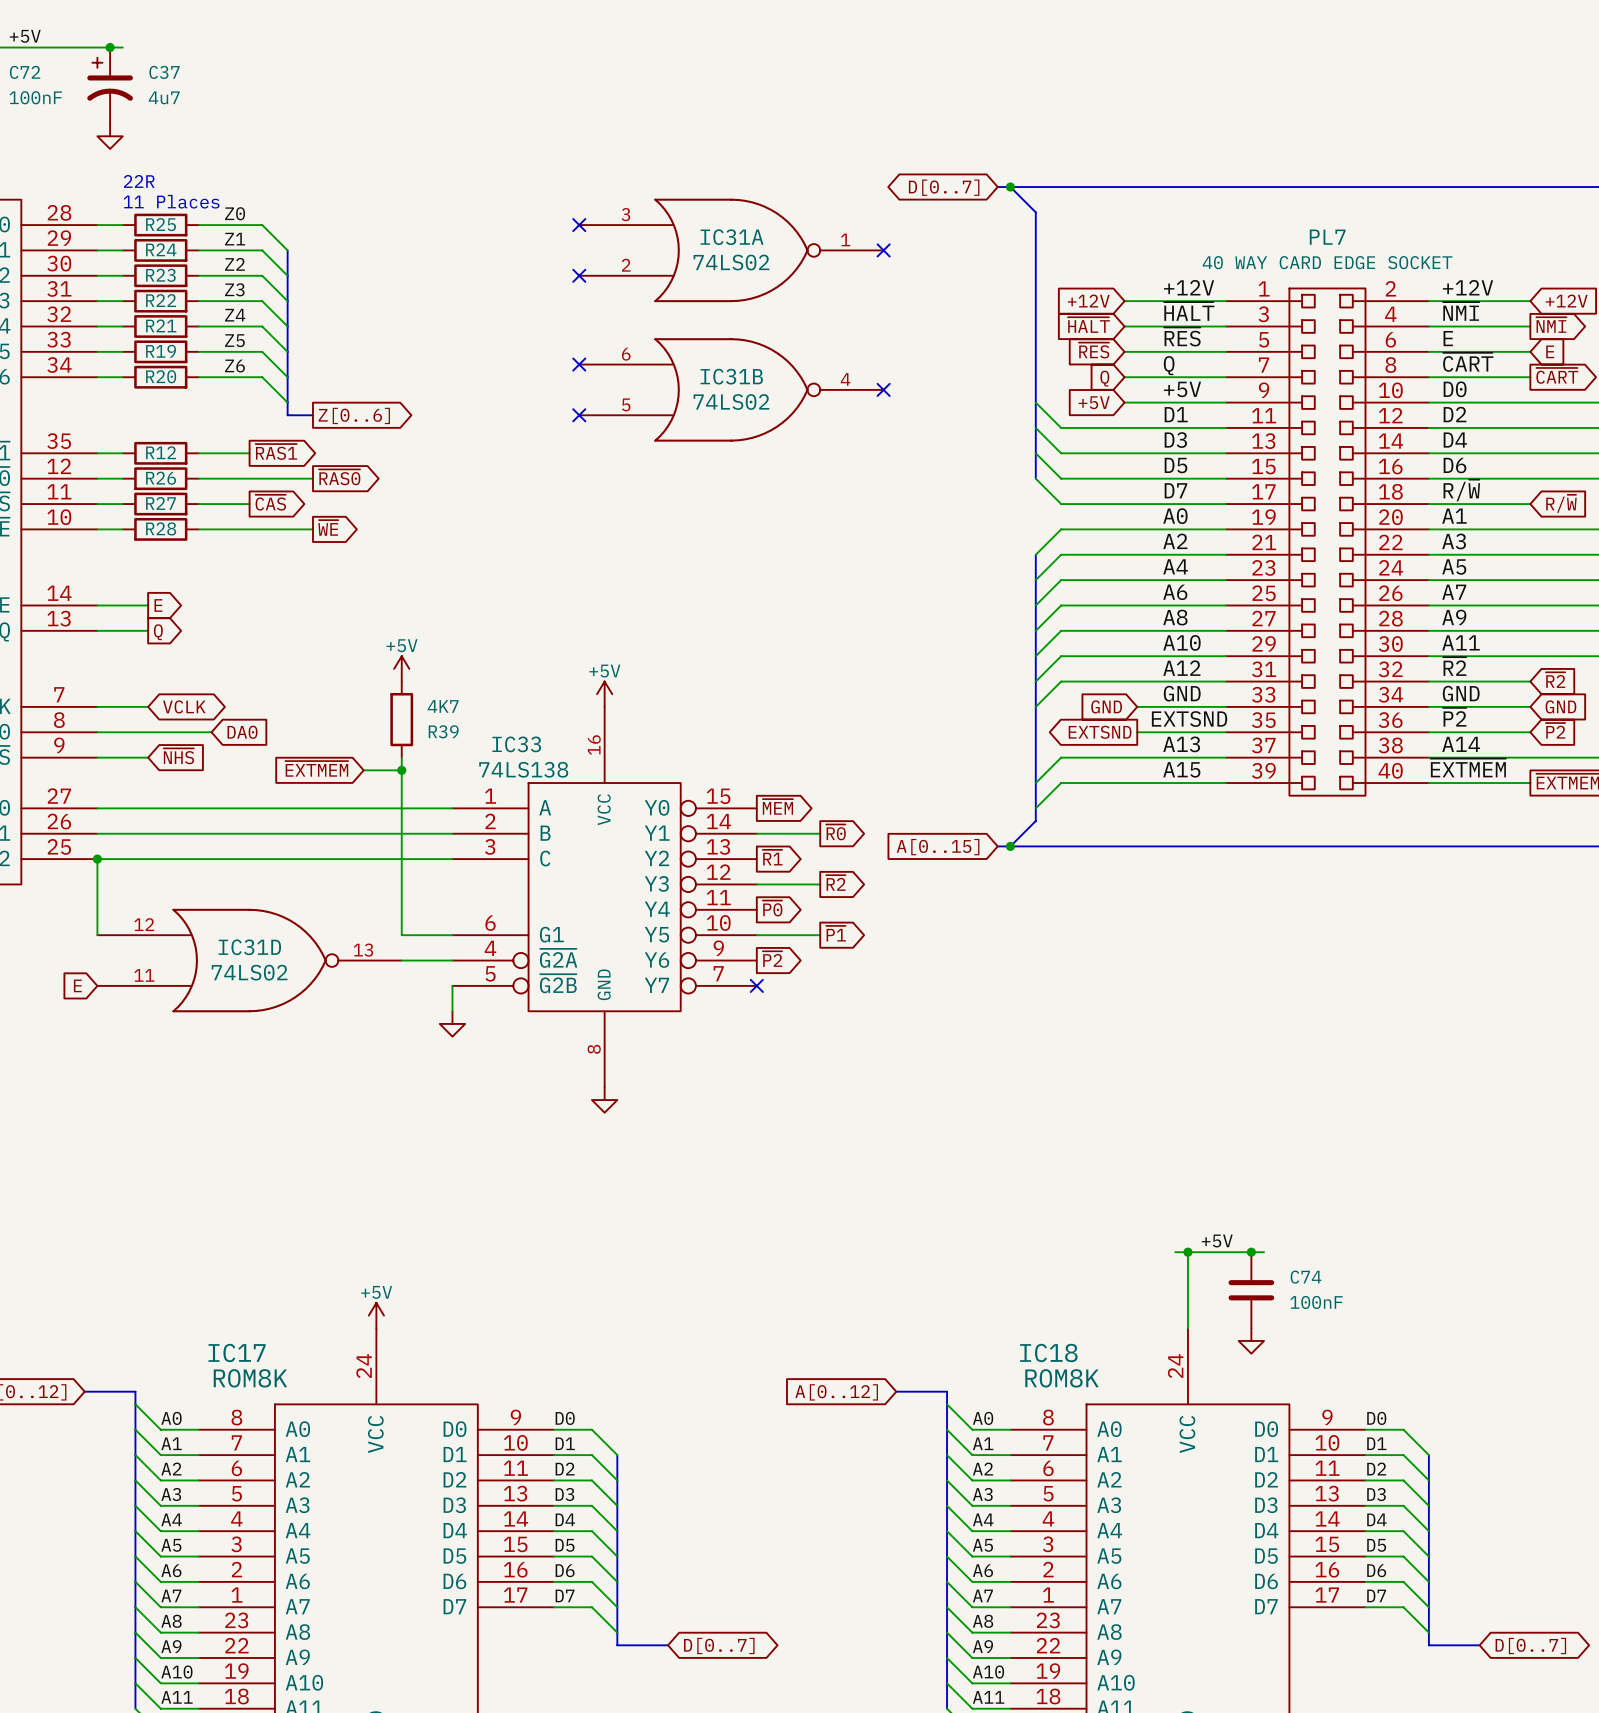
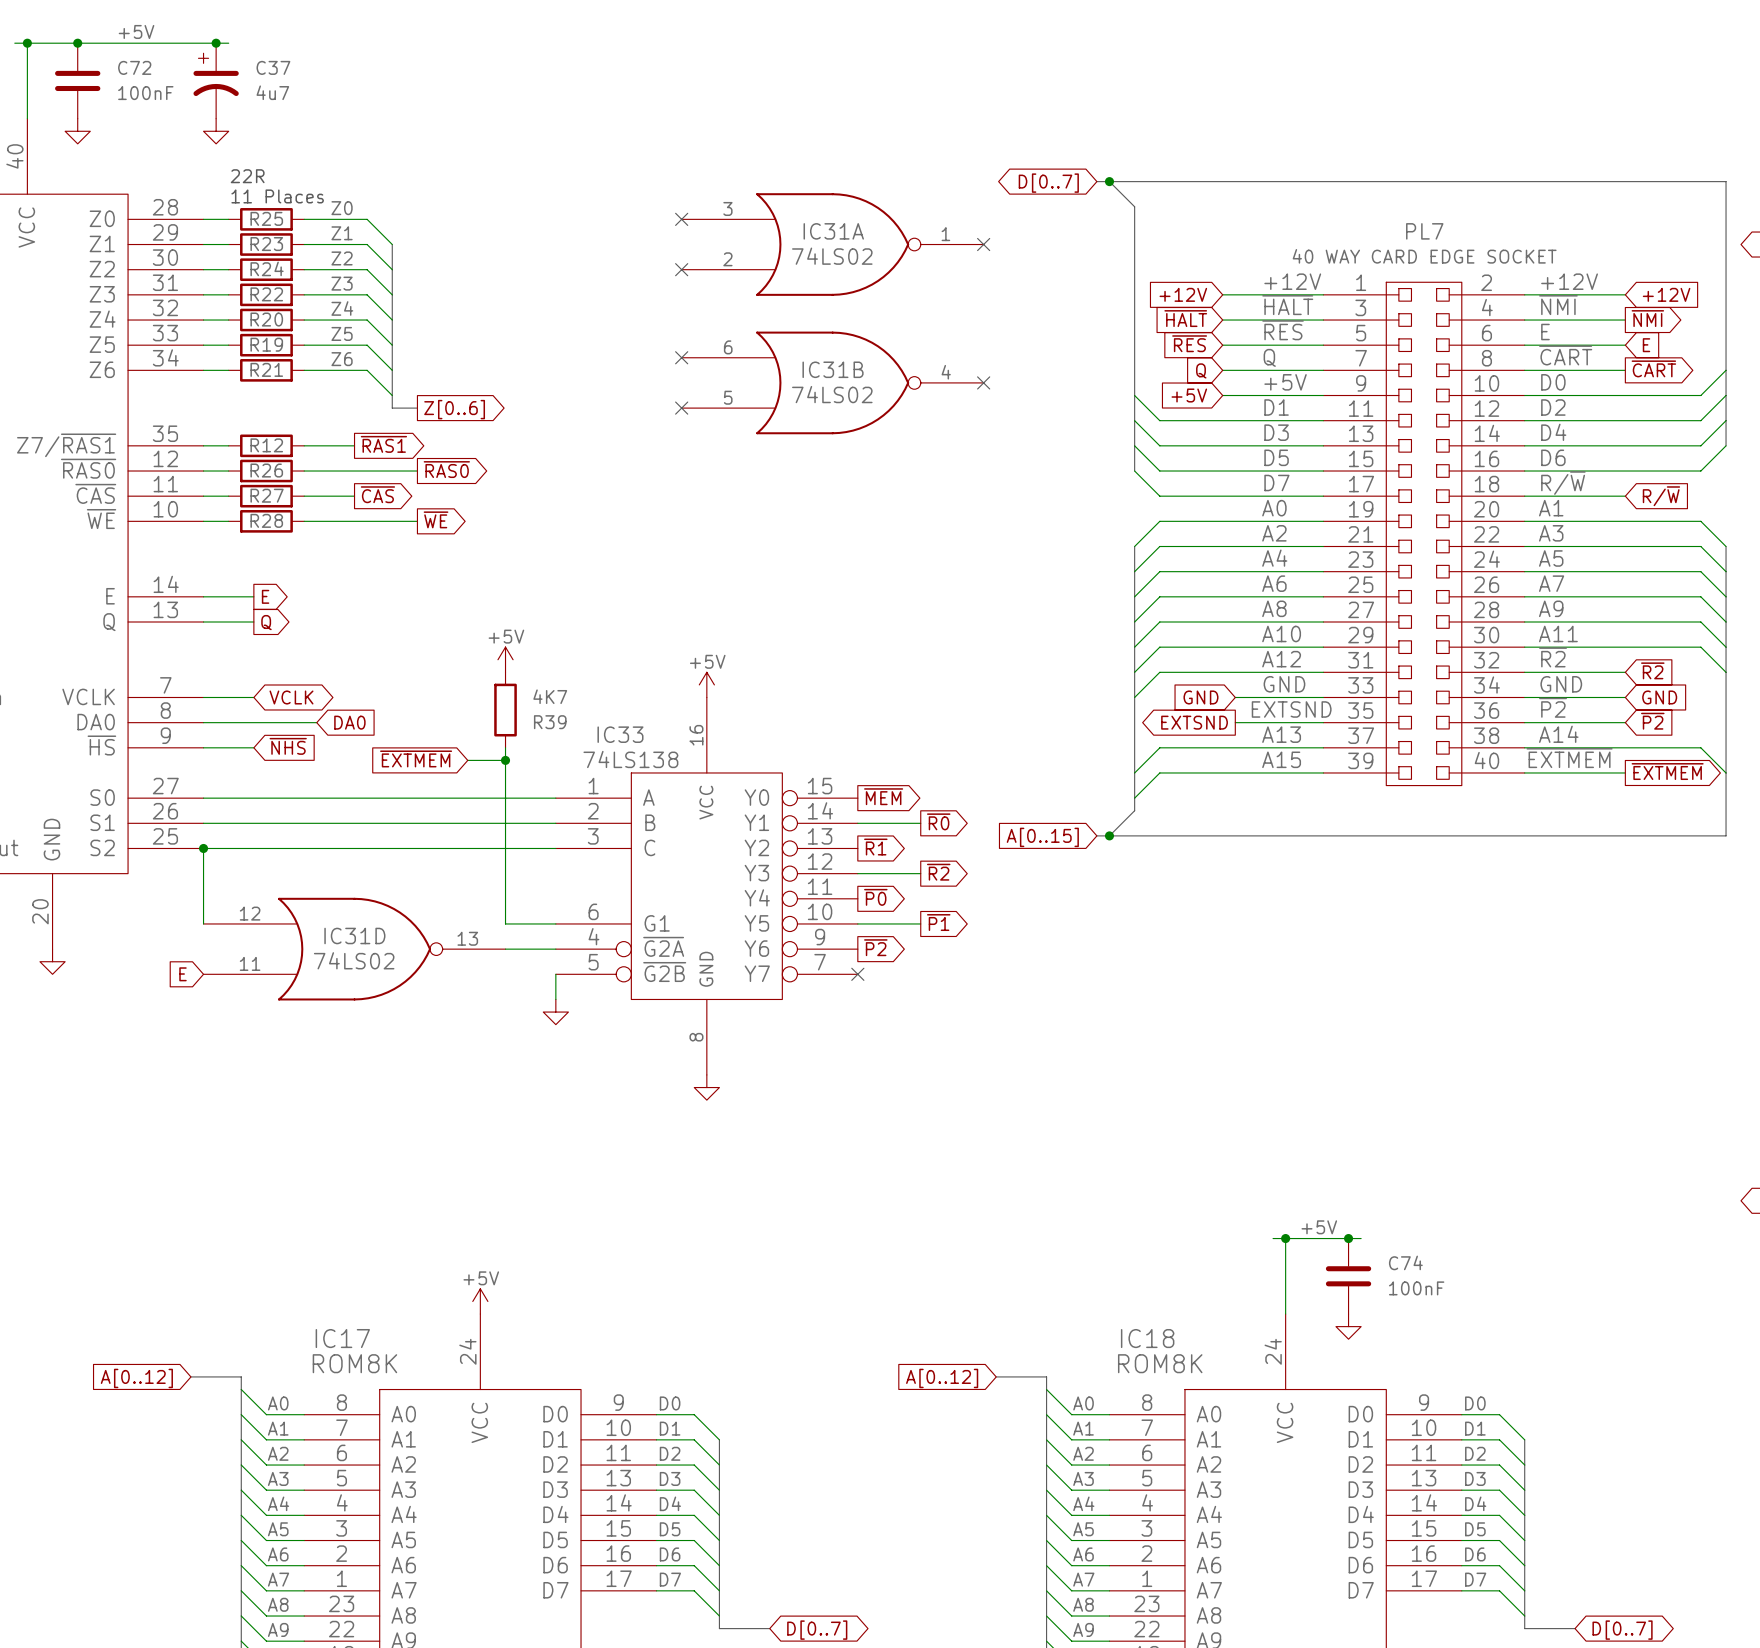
R24 name: R24 (161, 249) -> R23 (266, 244)
R23 name: R23 (160, 275) -> R24 (267, 268)
R21 name: R21 (161, 325) -> R20 (266, 319)
R20 name: R20 (161, 376) -> R21 (266, 369)

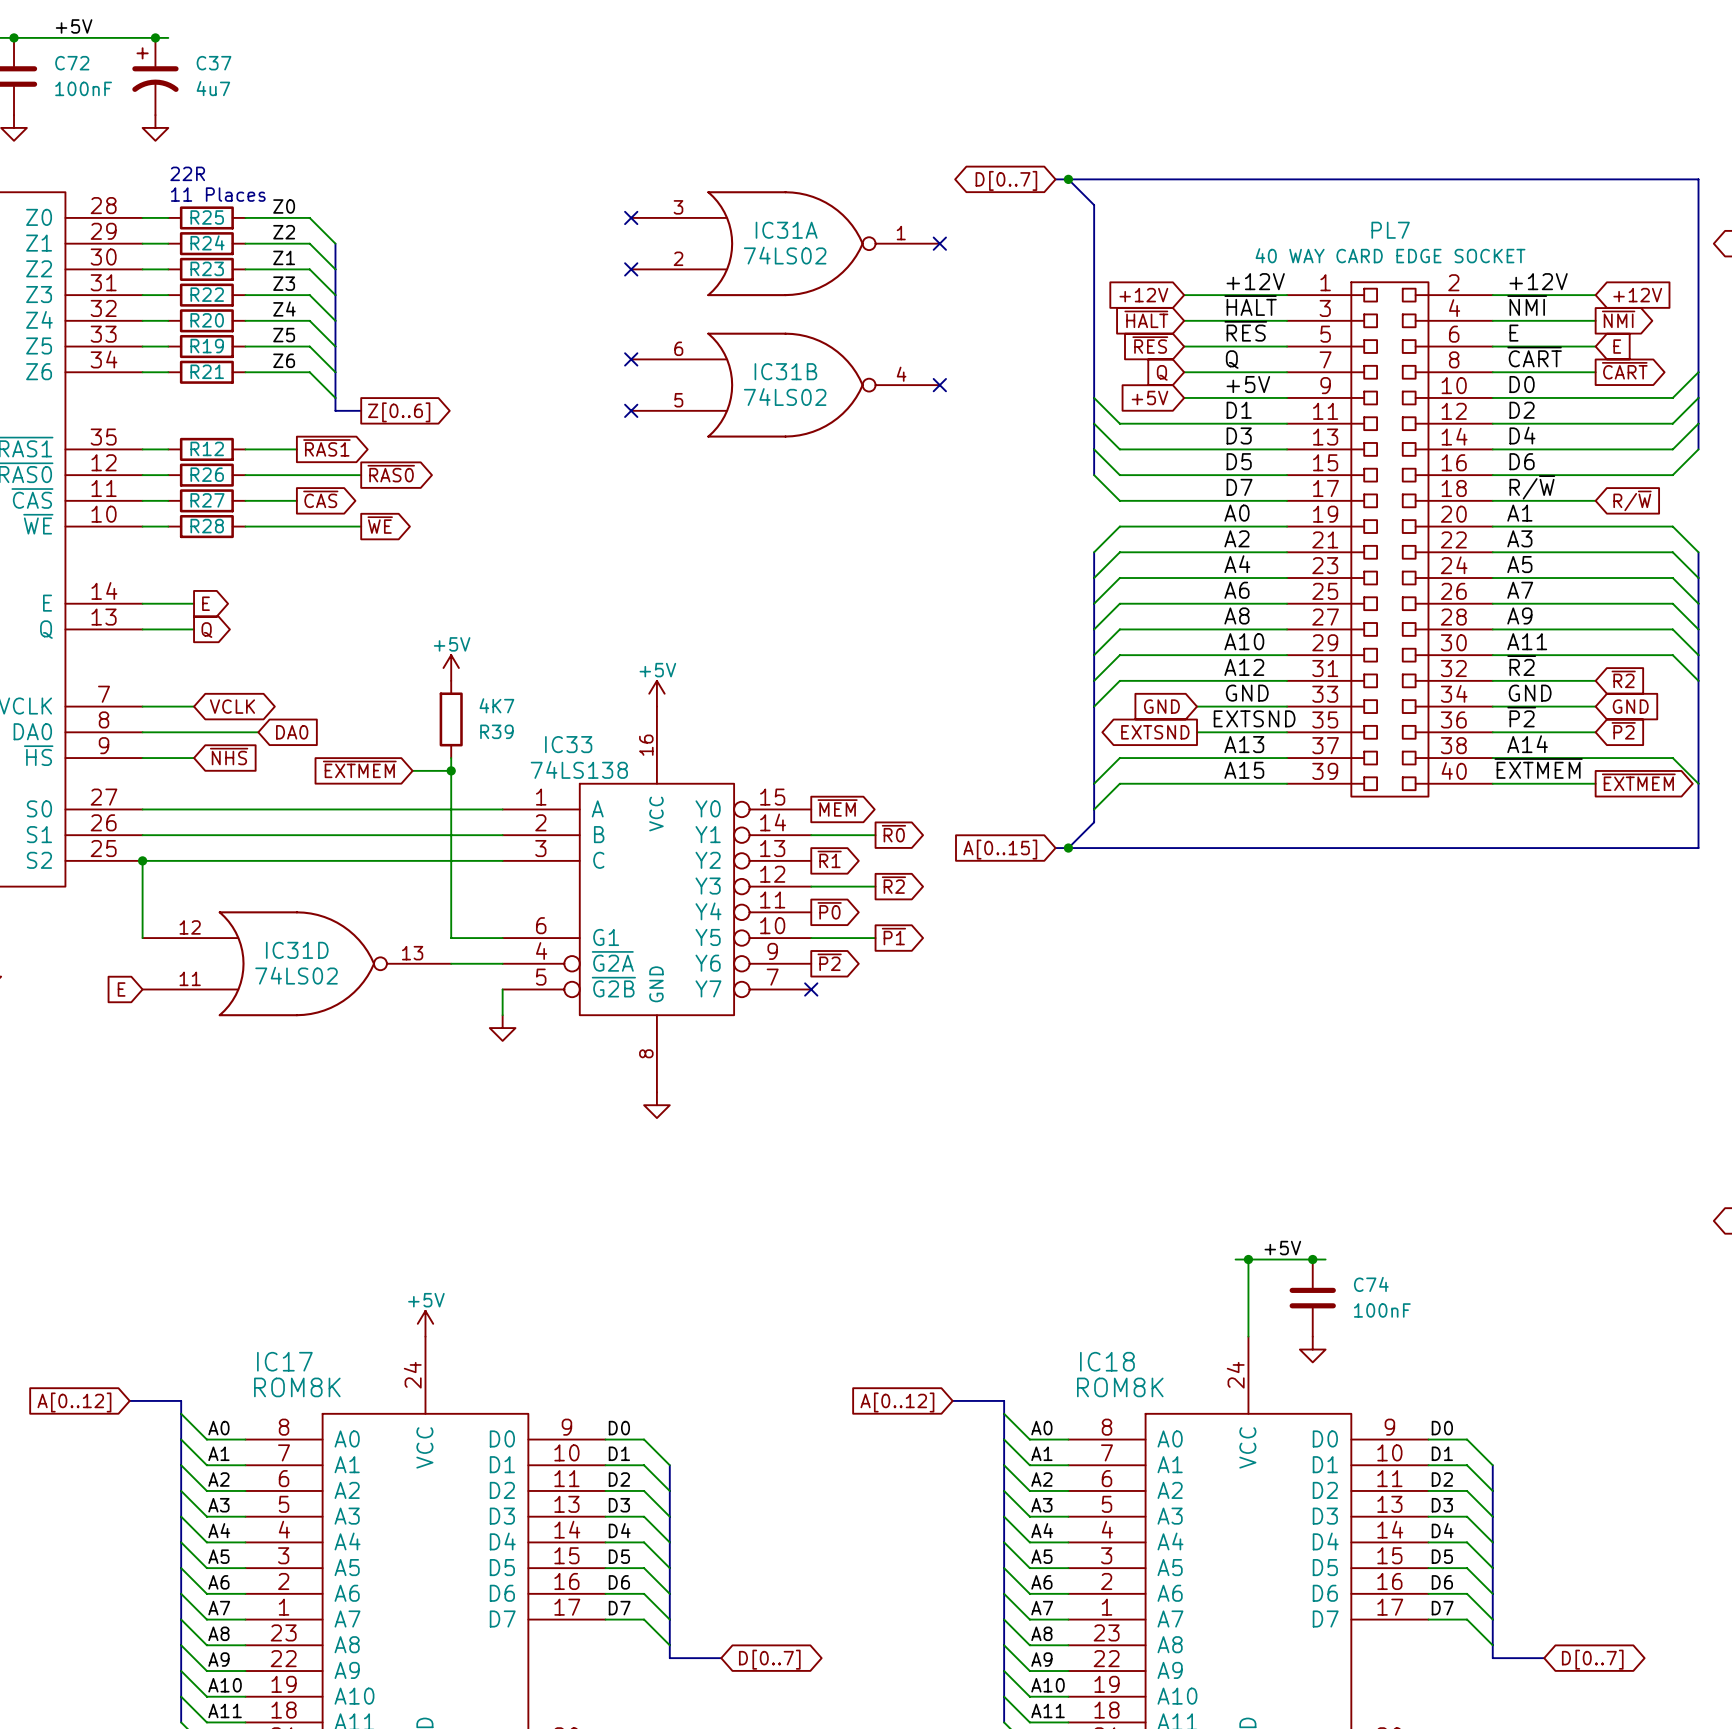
label: Z1 (342, 233) -> Z2 (284, 232)
R23 name: R23 (266, 244) -> R24 (207, 242)
label: Z2 (342, 258) -> Z1 (284, 257)
R24 name: R24 (267, 268) -> R23 (207, 268)

